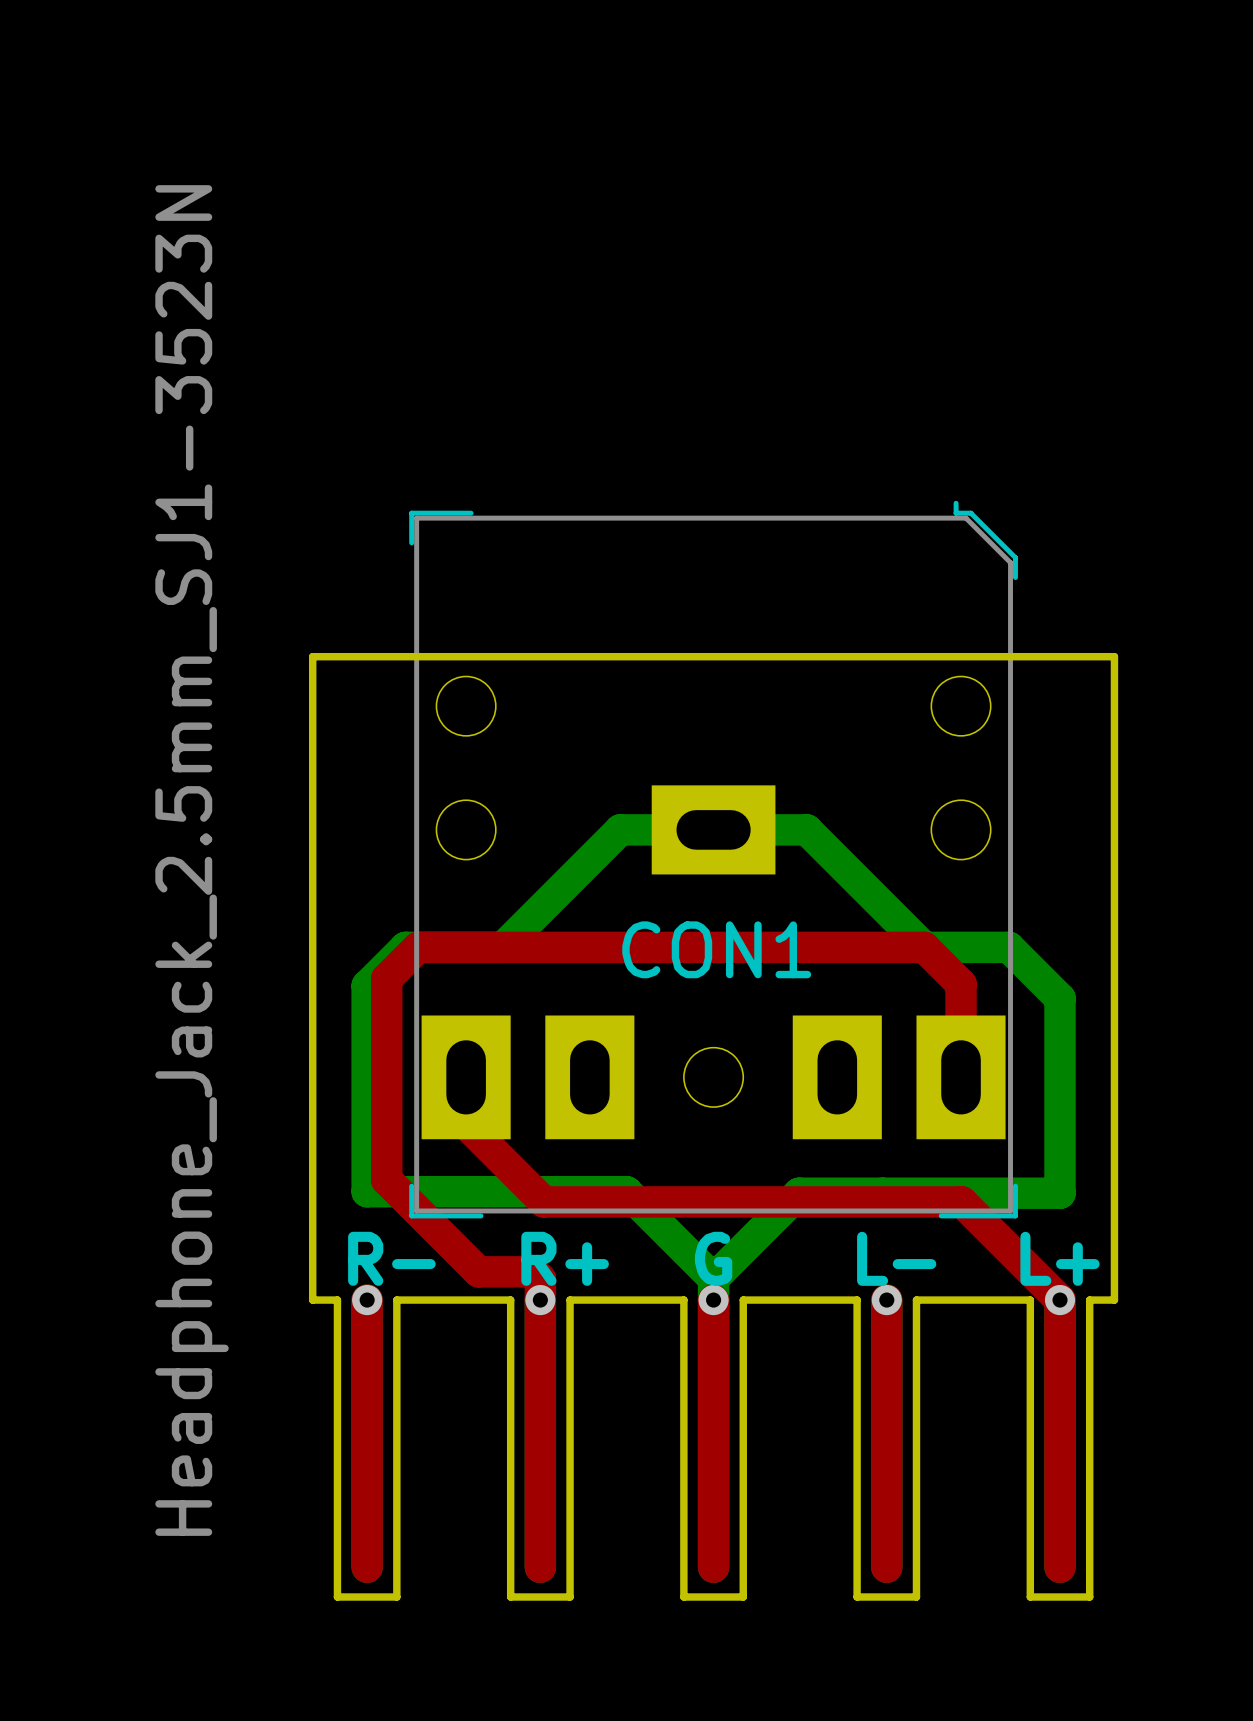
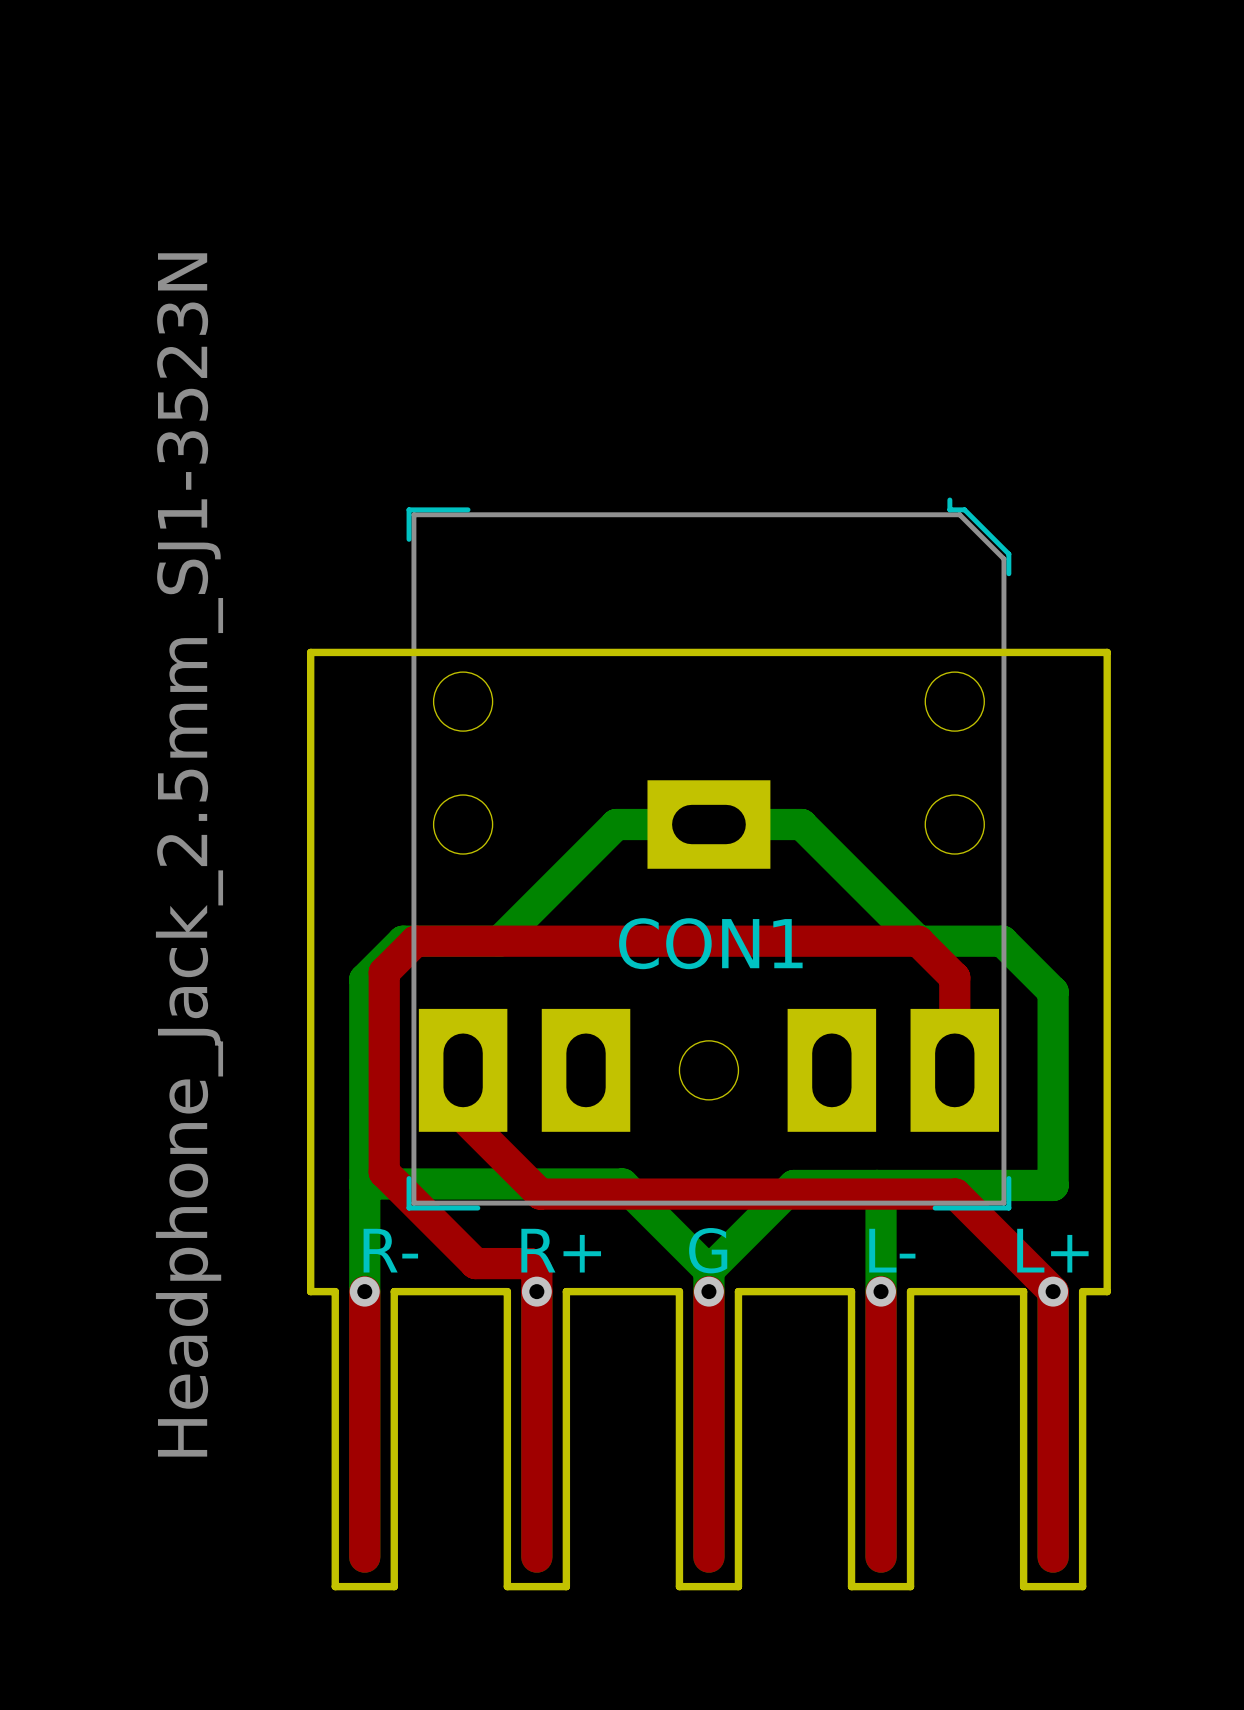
bottom track: none -> (364, 1183) (364, 1291)
bottom track: none -> (876, 1185) (881, 1189) (881, 1291)

